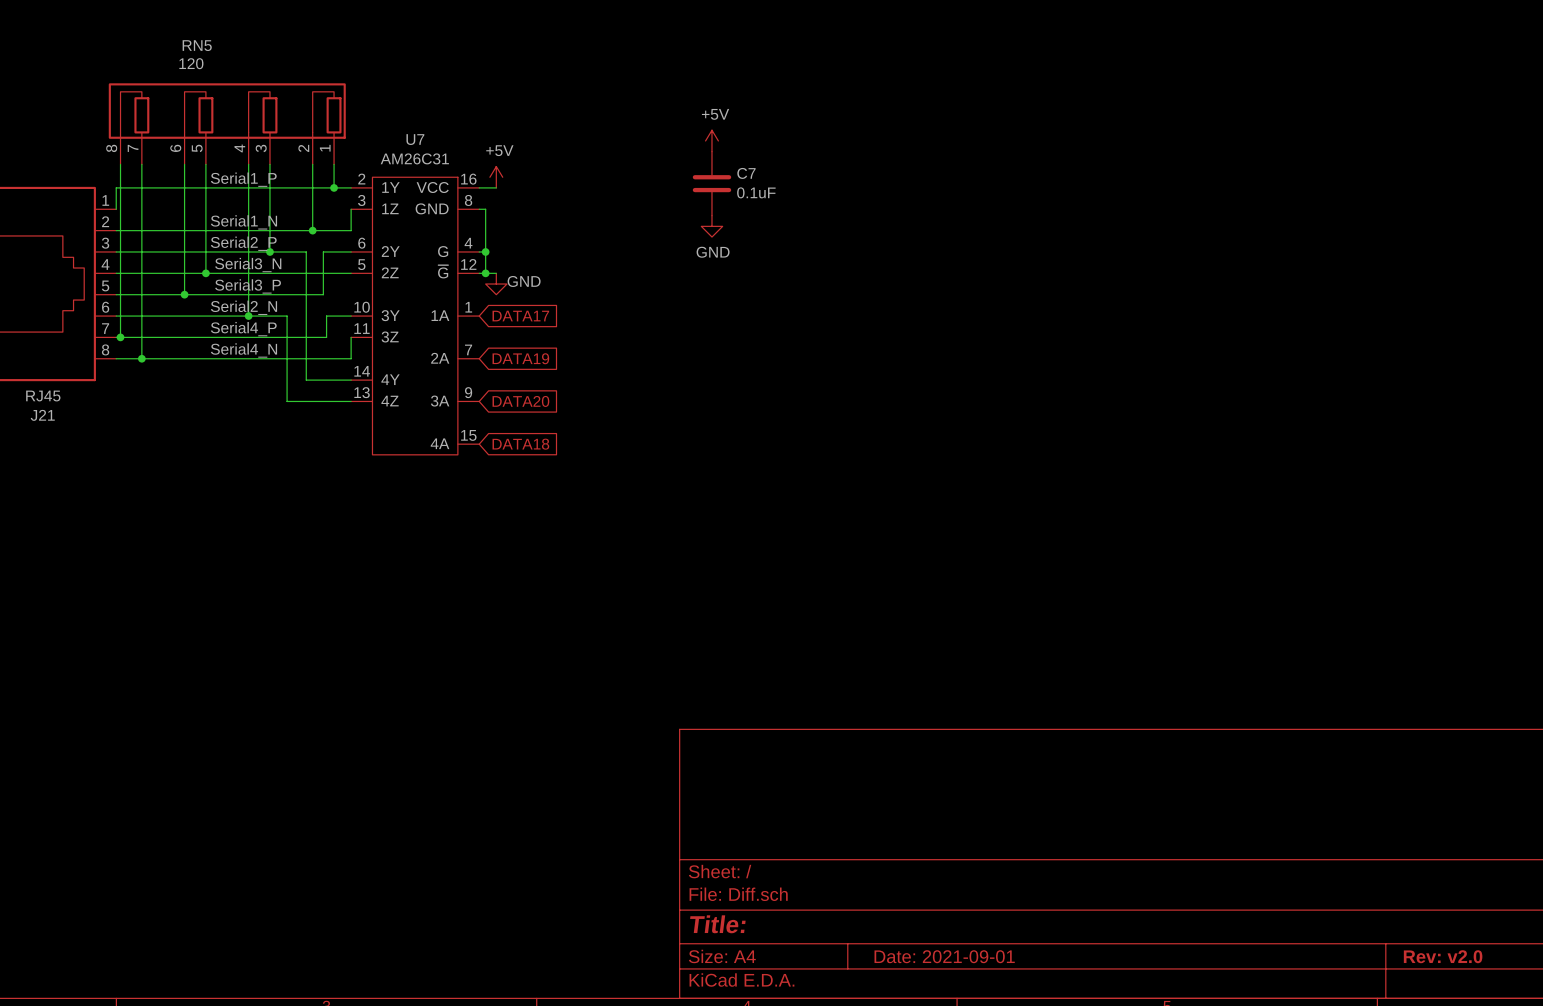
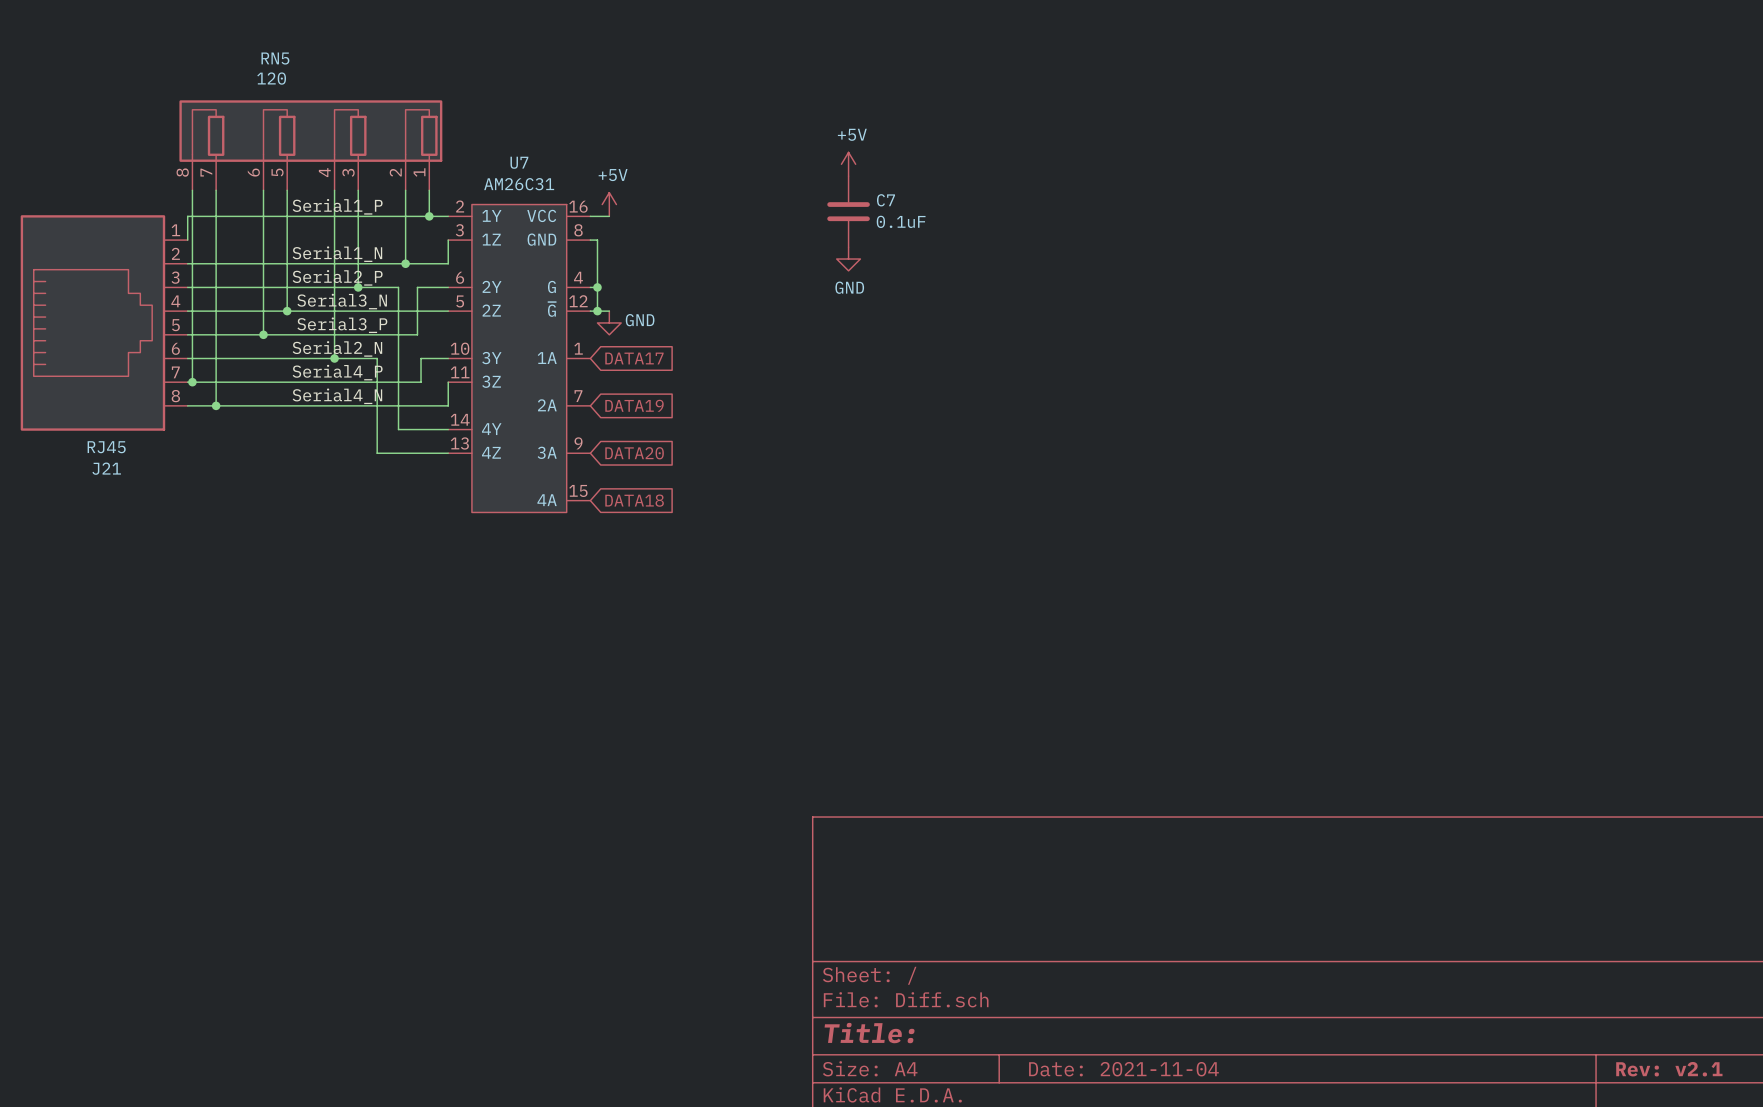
title block: Date: 2021-09-01 (944, 956) -> Date: 2021-11-04 (1123, 1069)
title block: Rev: v2.0 (1443, 956) -> Rev: v2.1 (1669, 1069)

